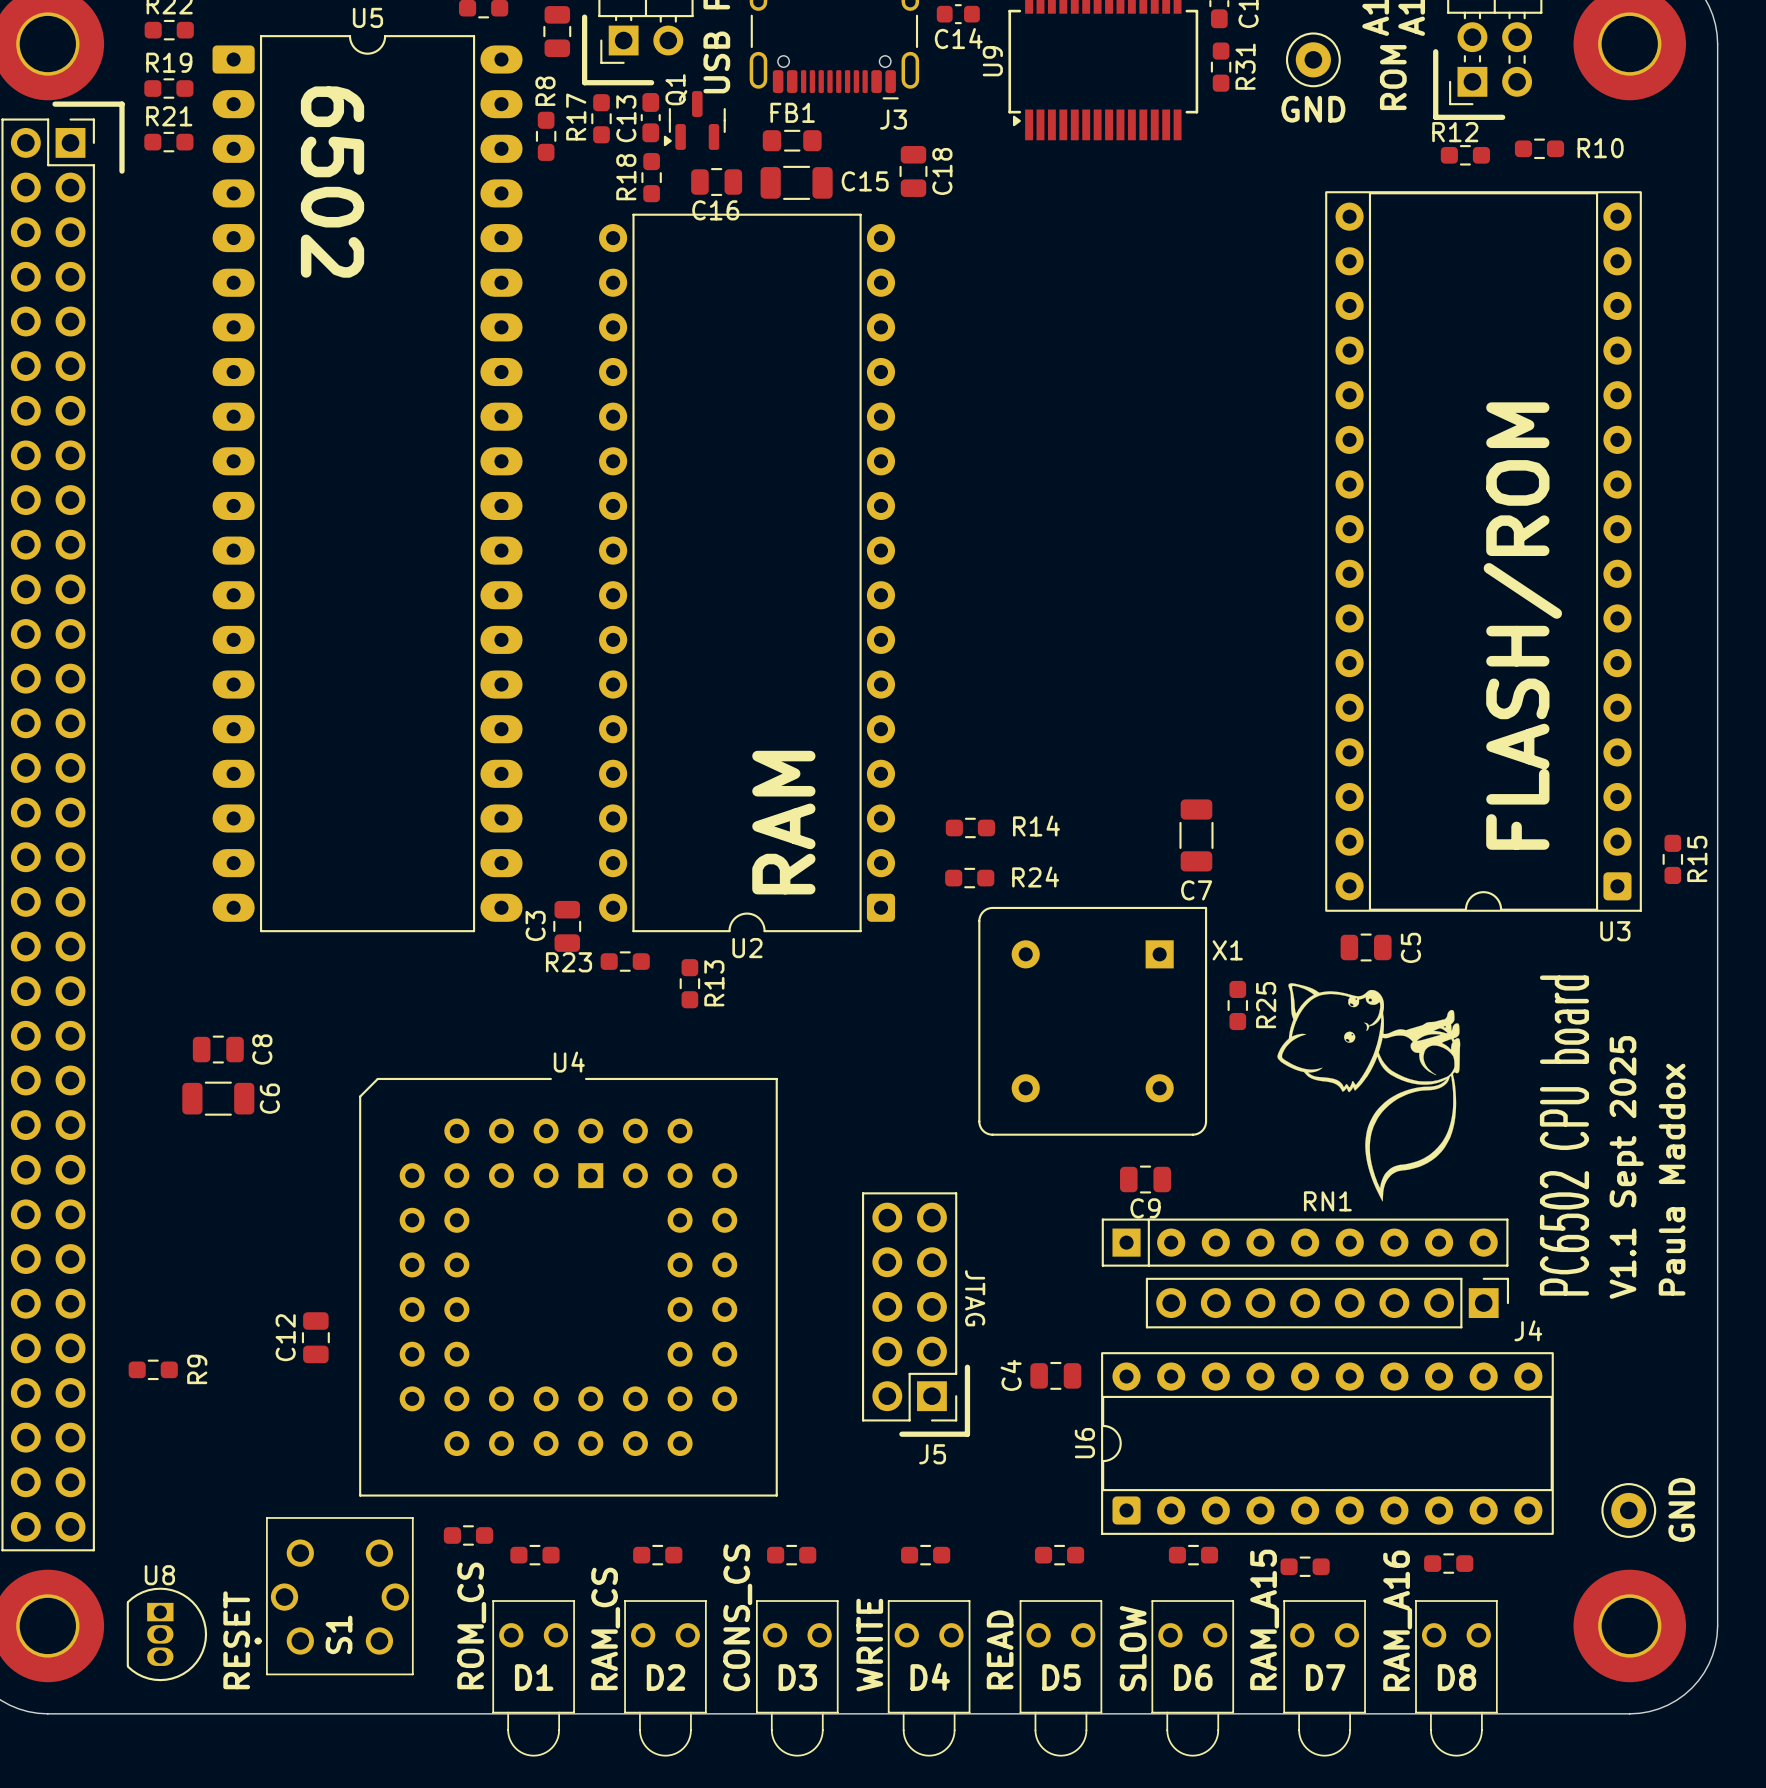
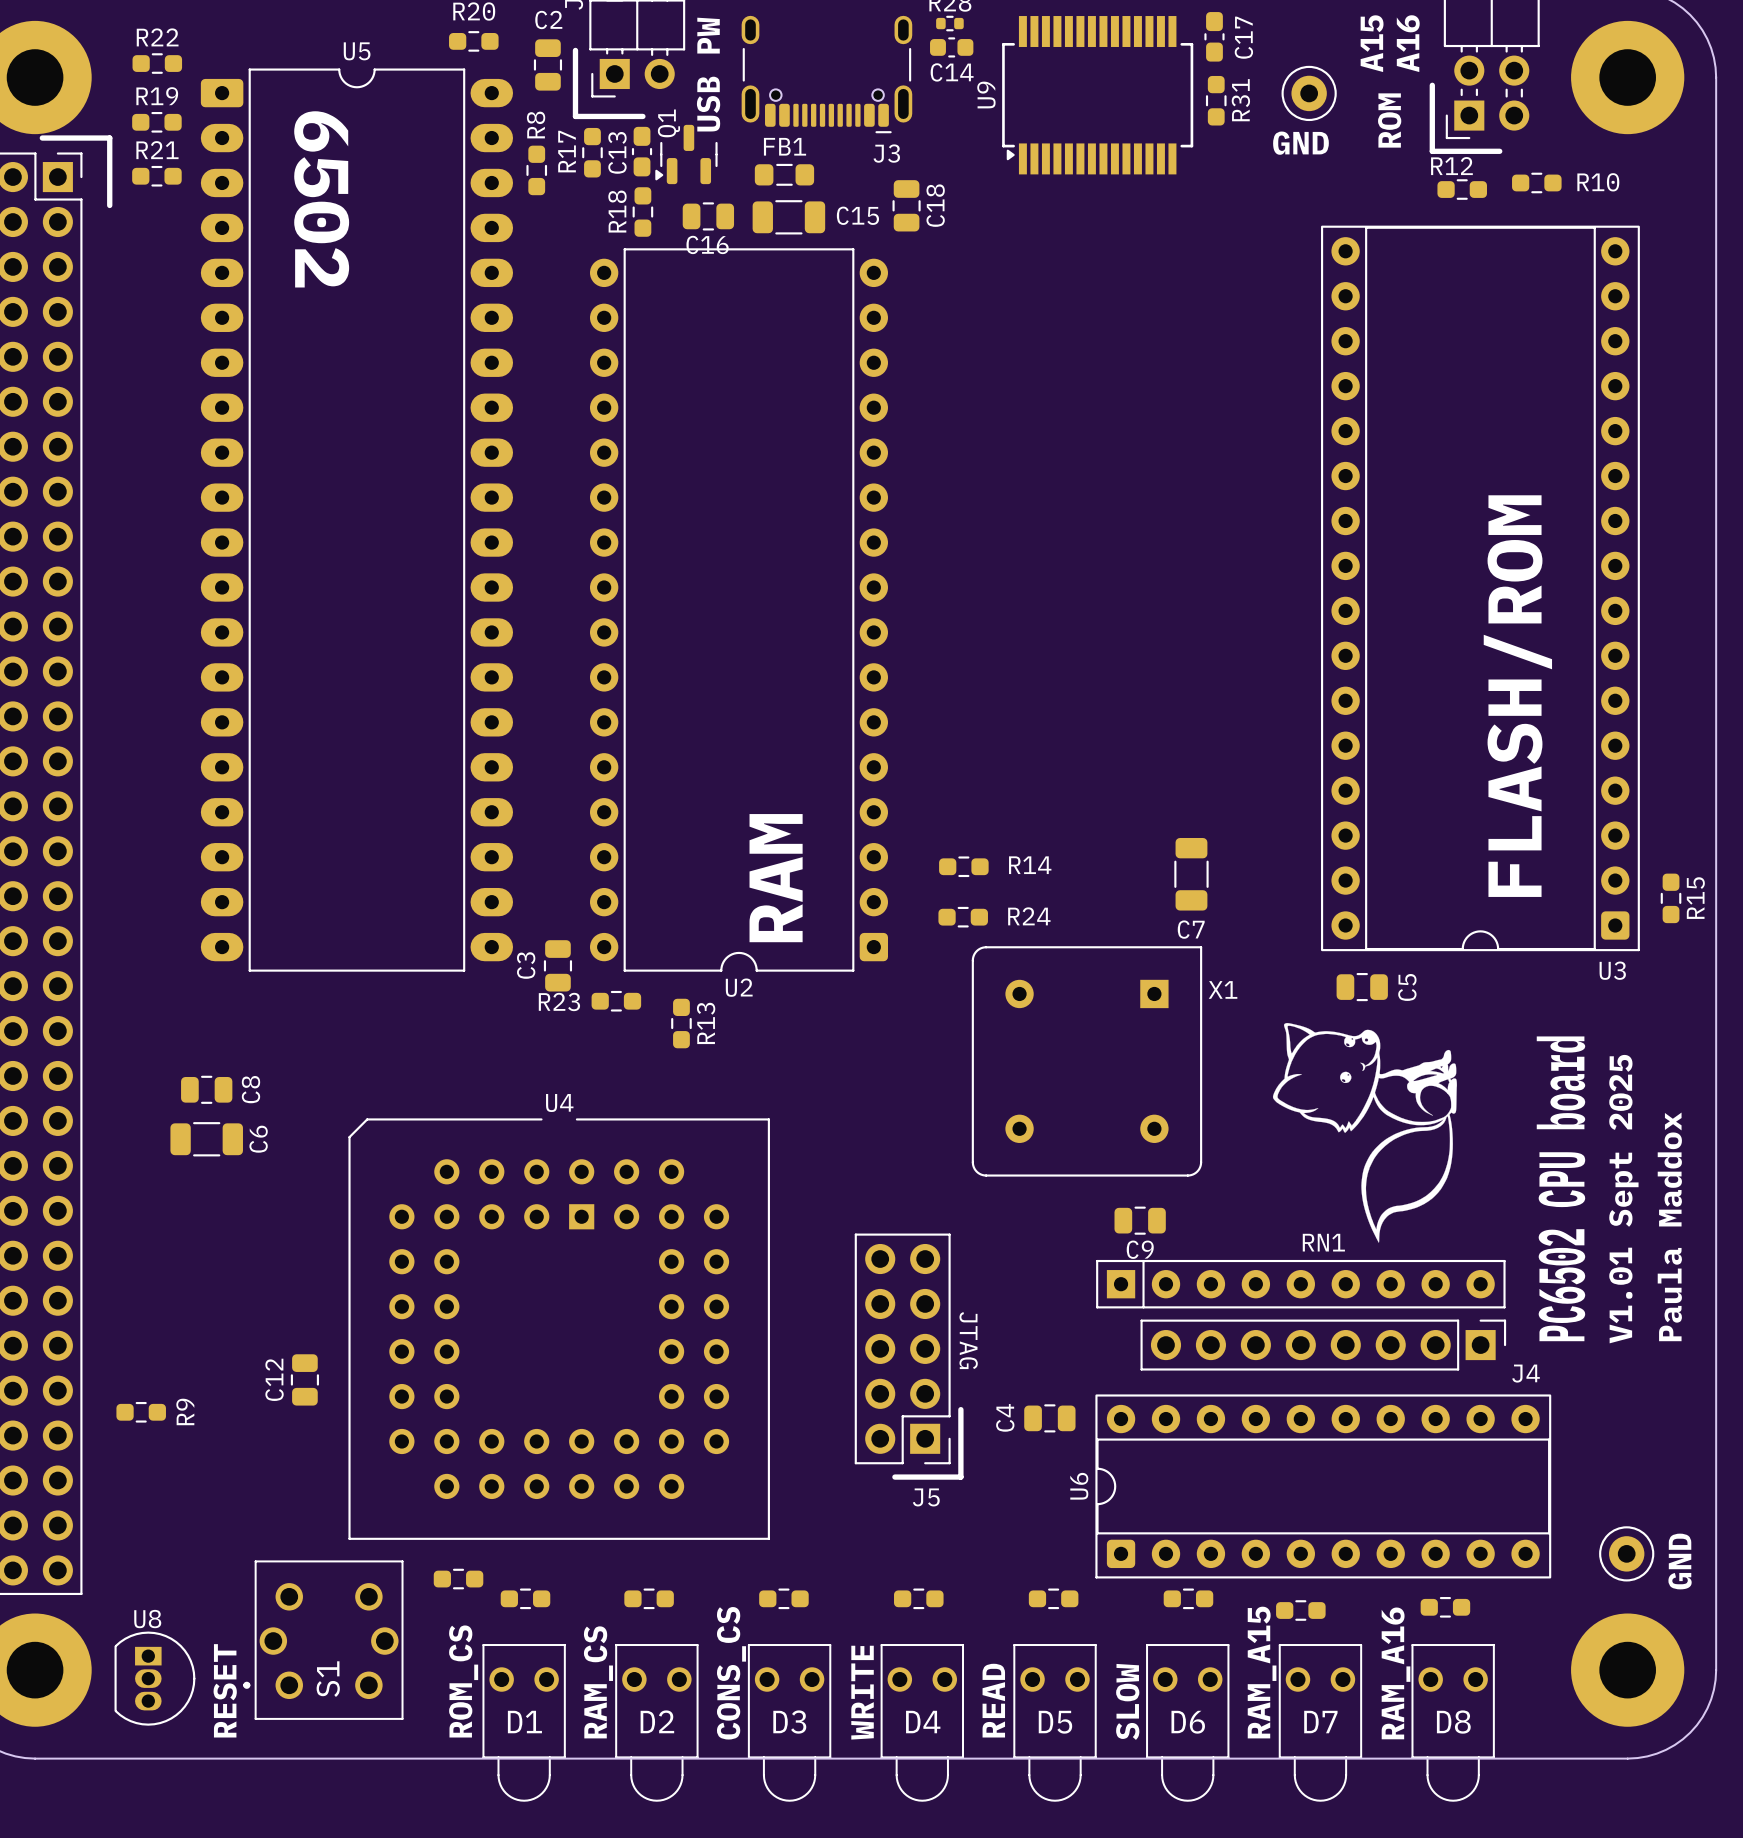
R25: (1237, 1005) -> none
text: V1.1 Sept 2025 (1626, 1167) -> V1.01 Sept 2025 (1623, 1199)

